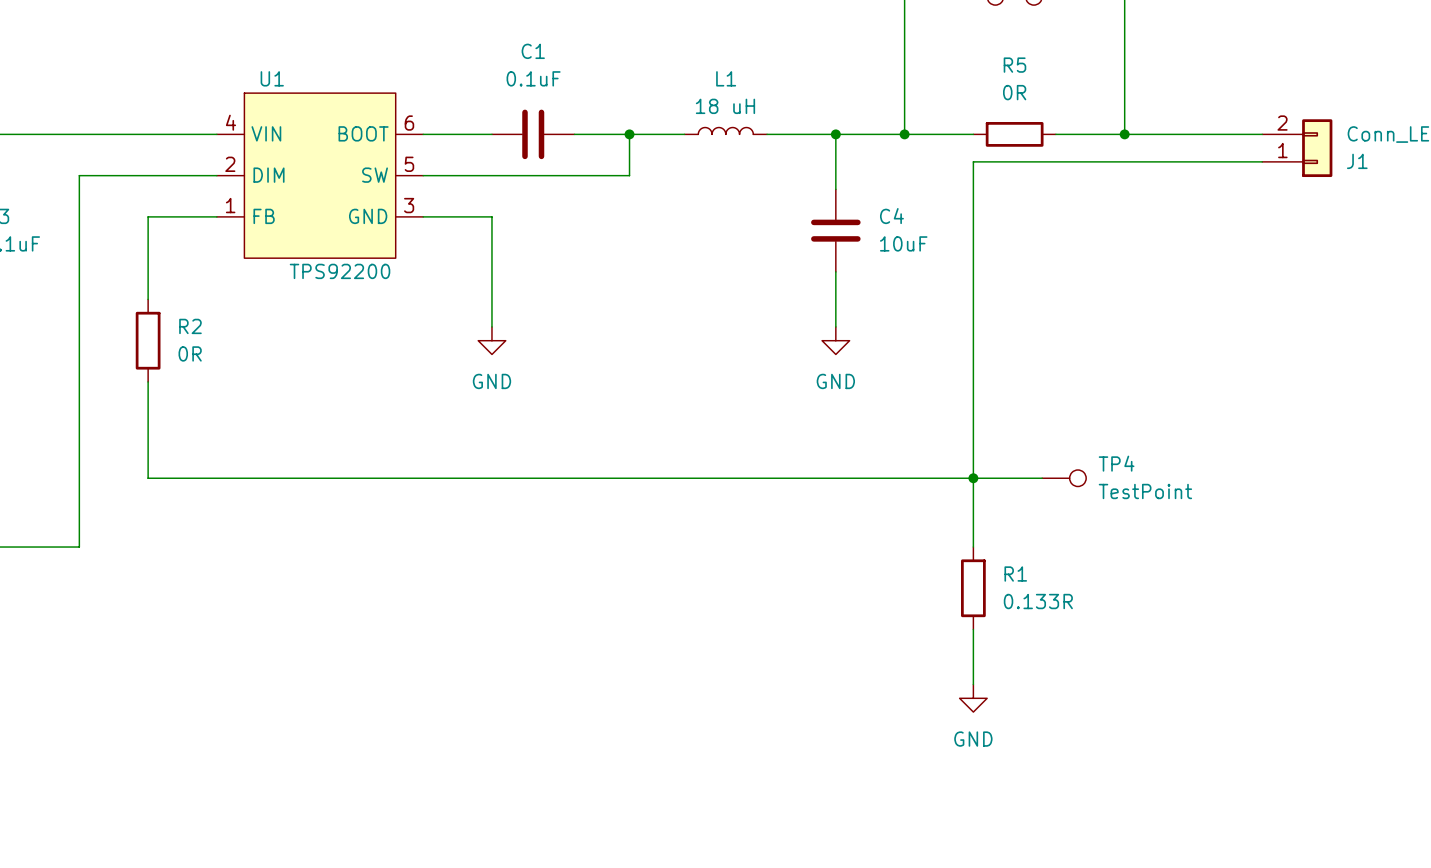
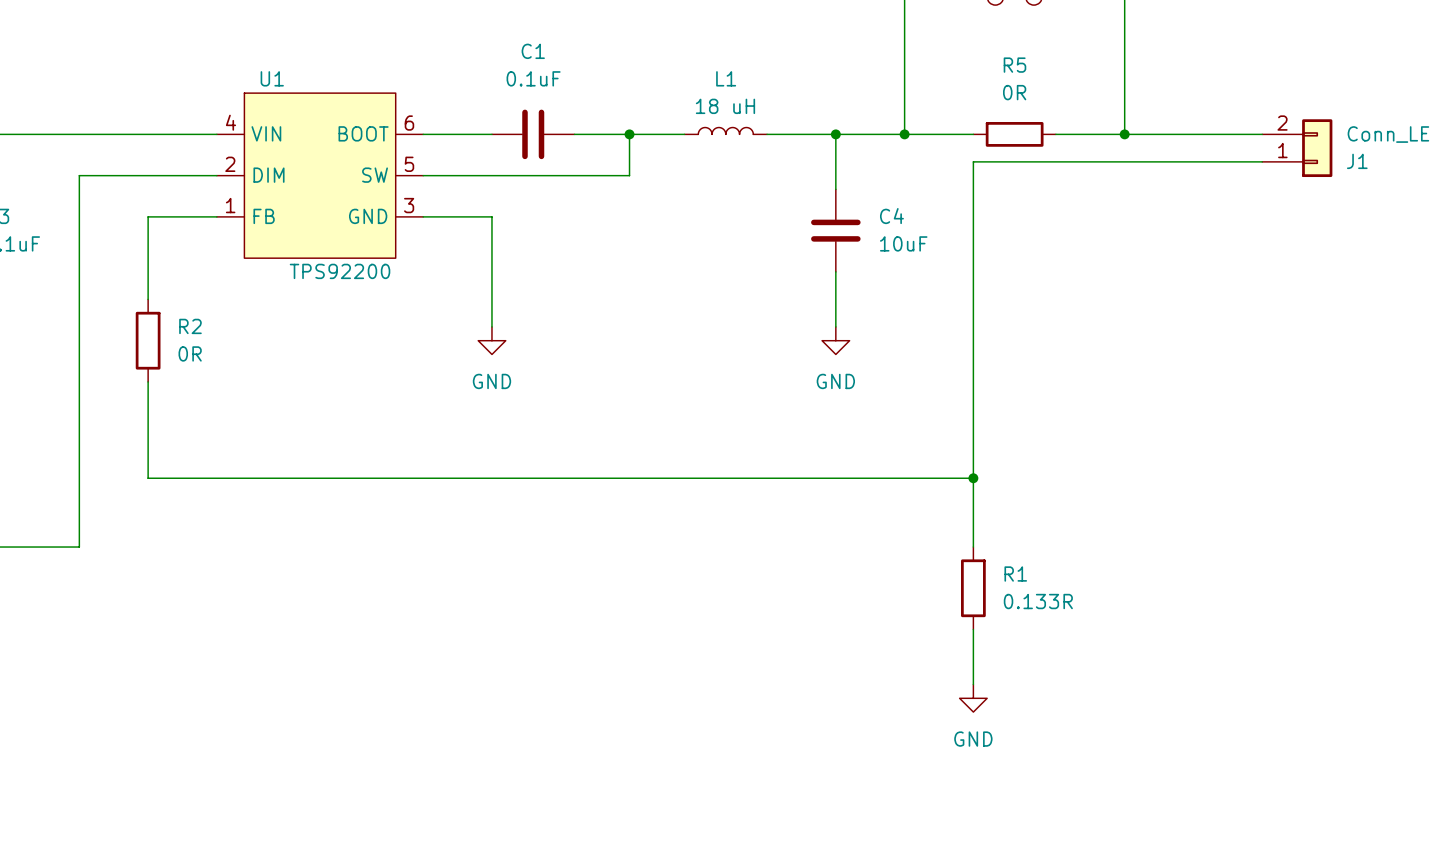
wire: (973, 478) (1042, 478) -> none
TP4: TestPoint (1064, 478) -> none

